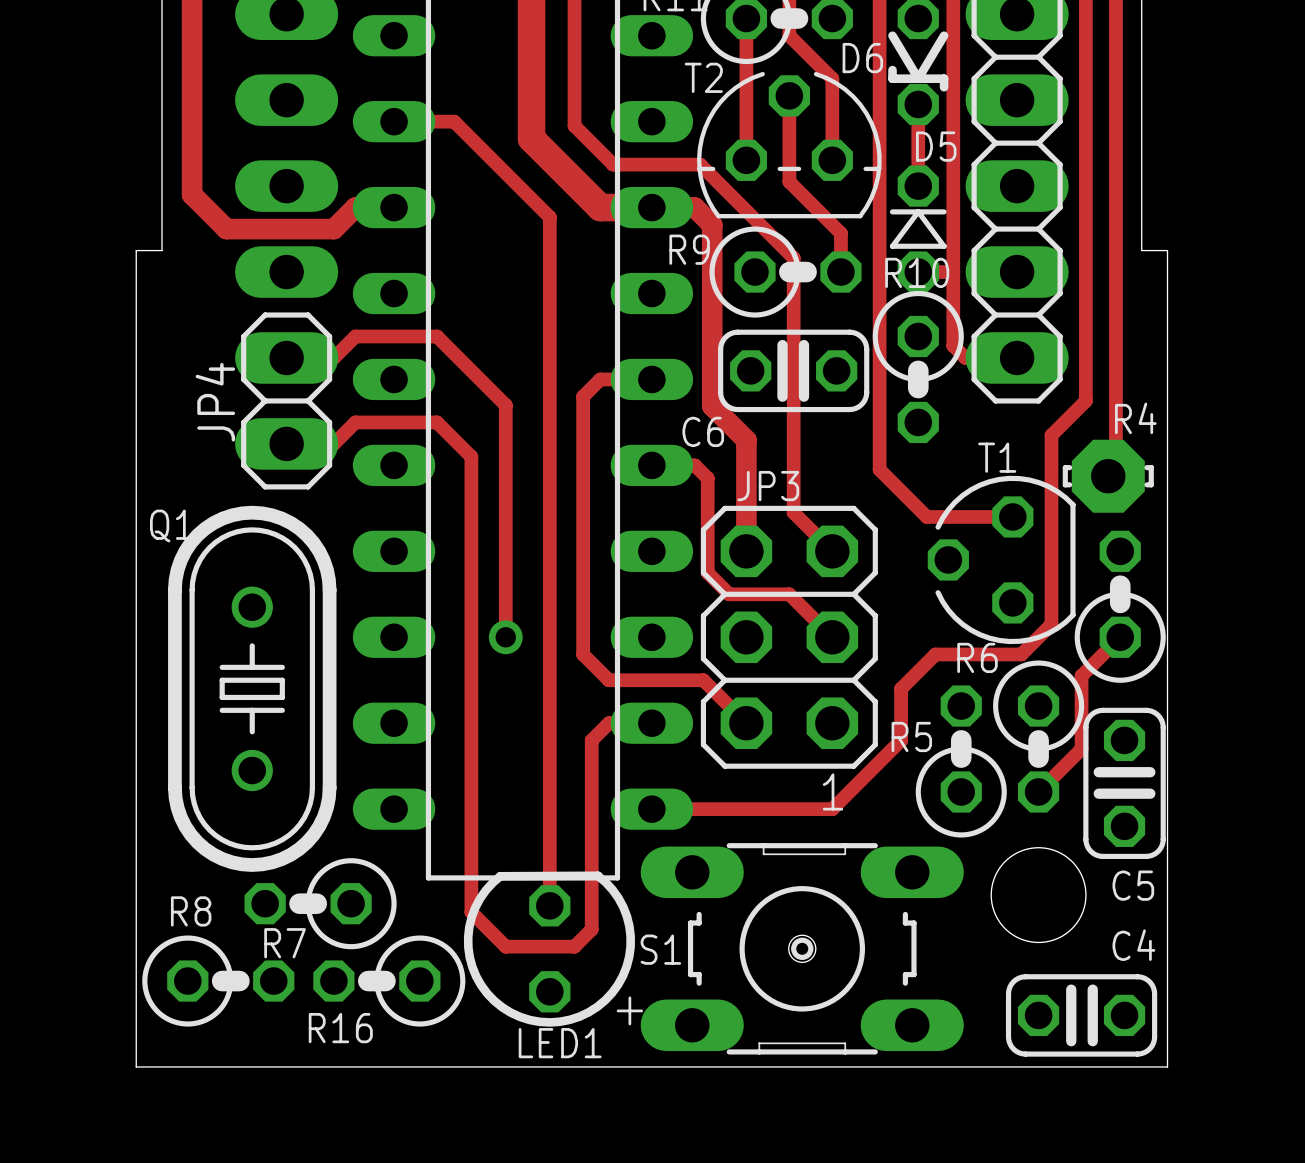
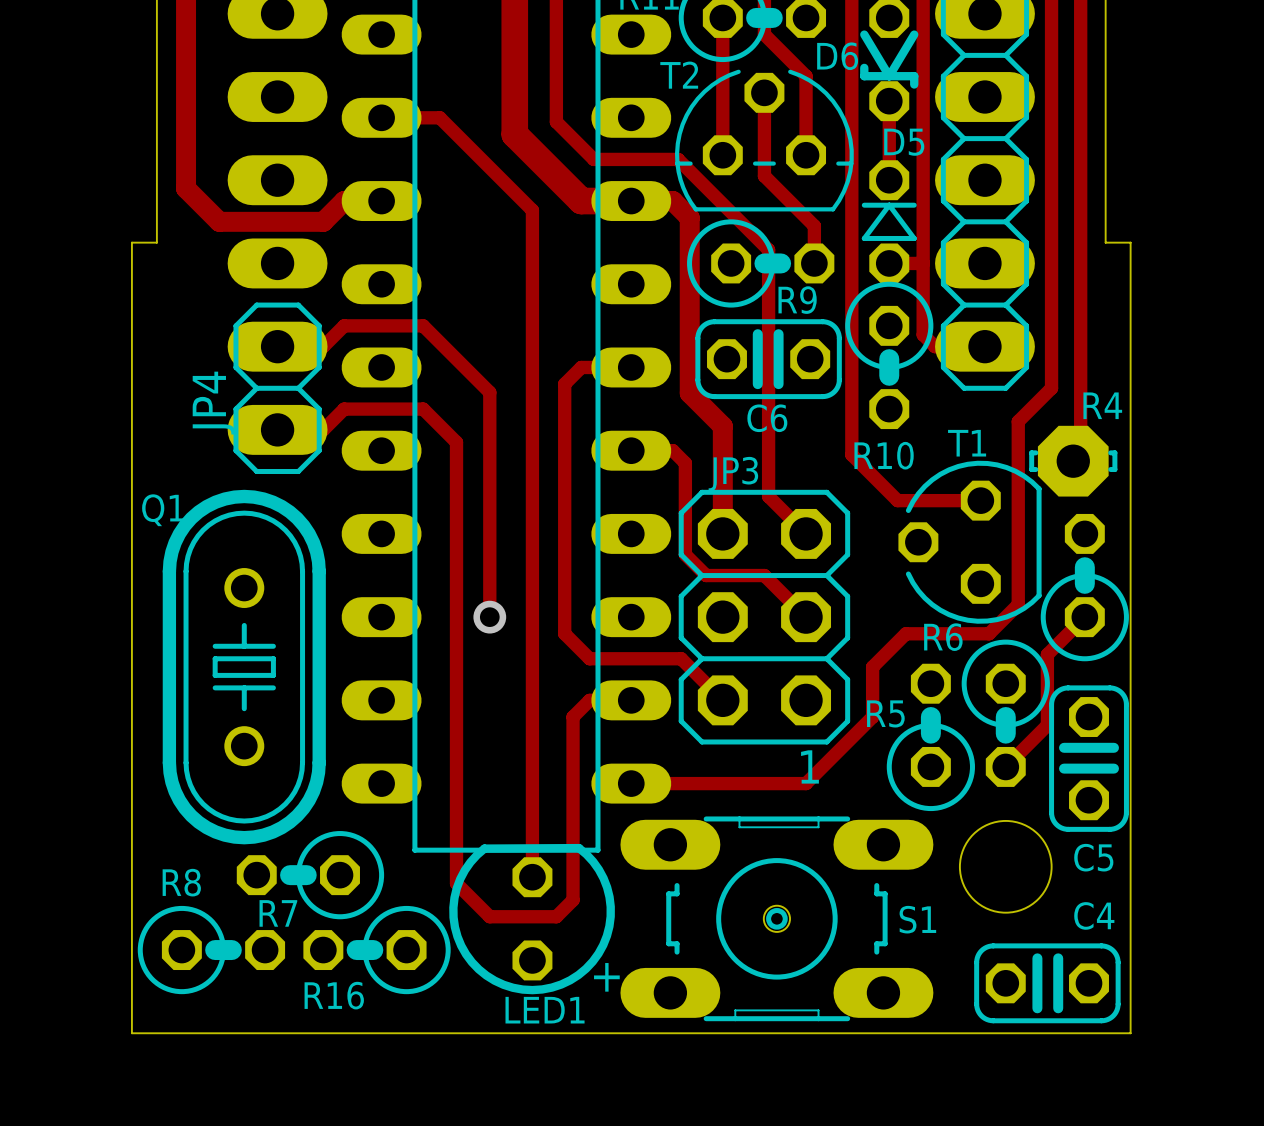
R9 name position: R9 (689, 249) -> R9 (797, 300)
R10 name position: R10 (917, 272) -> R10 (884, 455)
C6 name position: C6 (703, 431) -> C6 (767, 418)
S1 name position: S1 (660, 949) -> S1 (917, 919)

